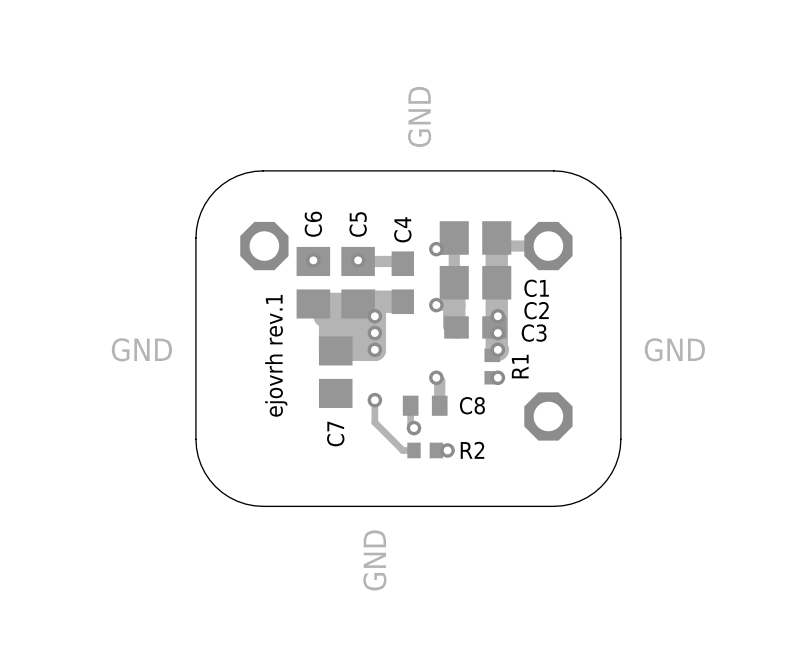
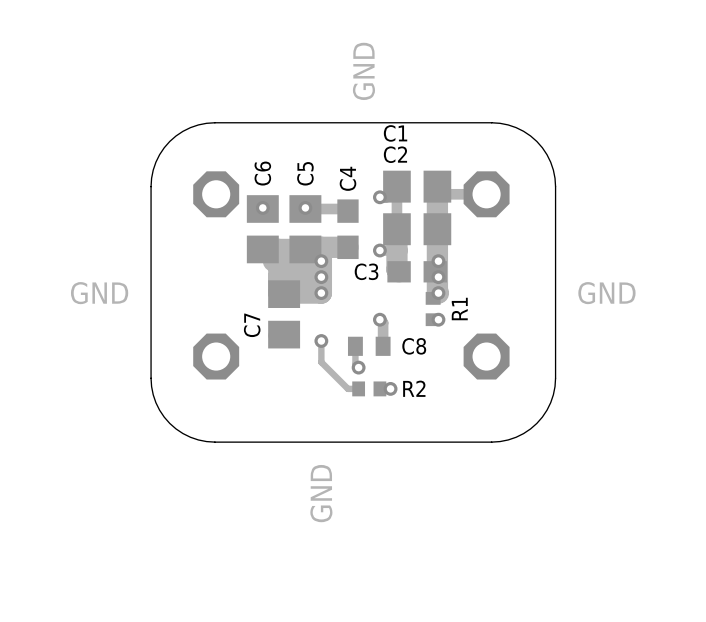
C1 name position: C1 (536, 288) -> C1 (395, 133)
C2 name position: C2 (536, 310) -> C2 (395, 154)
C3 name position: C3 (534, 333) -> C3 (366, 271)
text: ejovrh rev.1 (276, 355) -> none
part: none -> (216, 356)
C7 name position: C7 (335, 433) -> C7 (252, 325)

